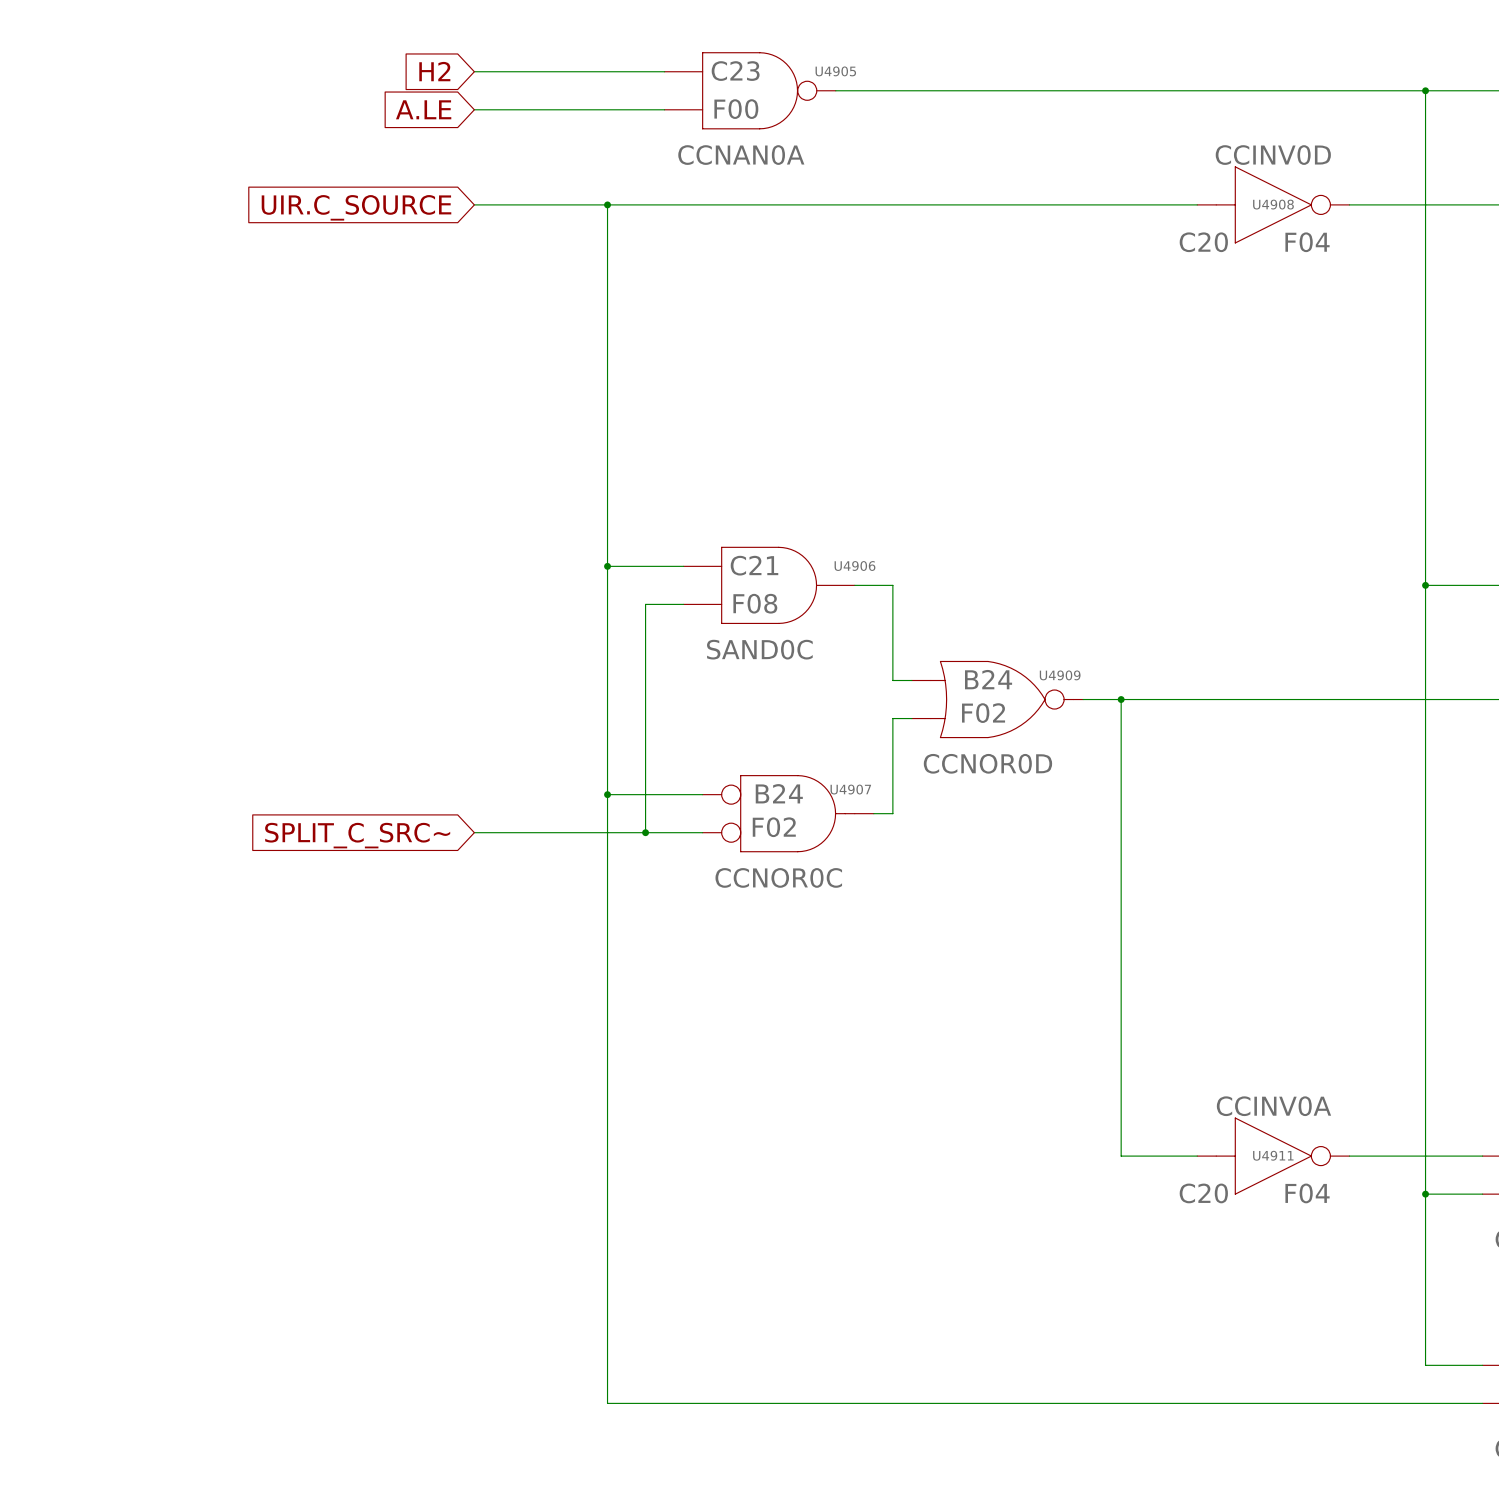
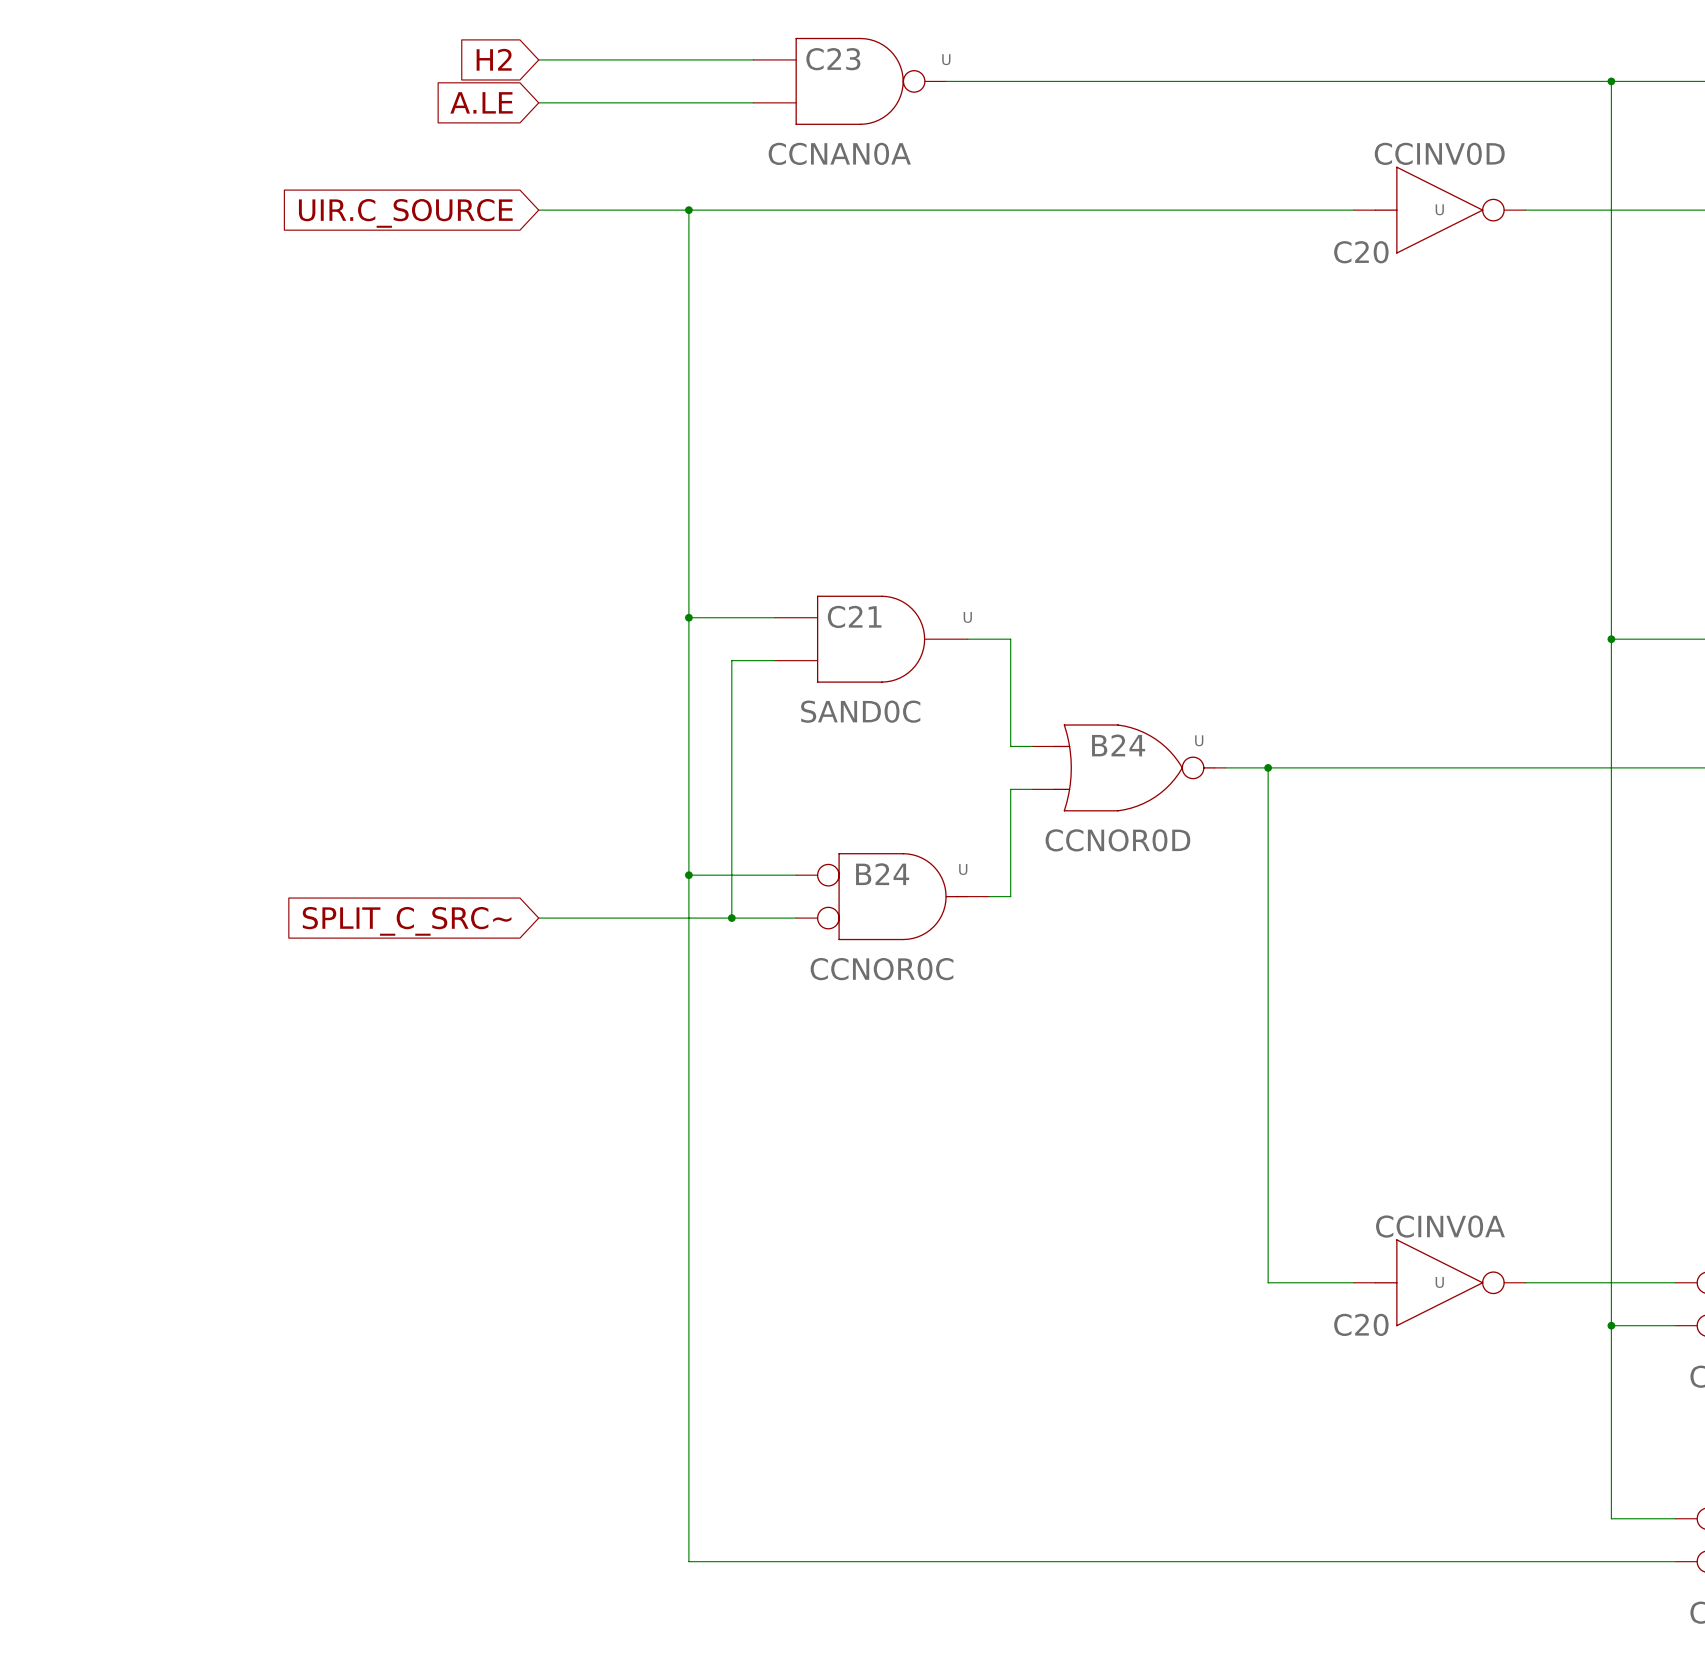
U4905 name: U4905 (835, 71) -> U (946, 59)
U4905 value: F00 (736, 109) -> none
U4908 name: U4908 (1273, 204) -> U (1439, 209)
U4908 value: F04 (1307, 242) -> none
U4906 name: U4906 (854, 566) -> U (967, 617)
U4906 value: F08 (755, 603) -> none
U4909 name: U4909 (1060, 675) -> U (1199, 740)
U4909 value: F02 (983, 713) -> none
U4907 name: U4907 (850, 789) -> U (963, 869)
U4907 value: F02 (774, 827) -> none
U4911 name: U4911 (1273, 1155) -> U (1439, 1282)
U4911 value: F04 (1307, 1193) -> none

